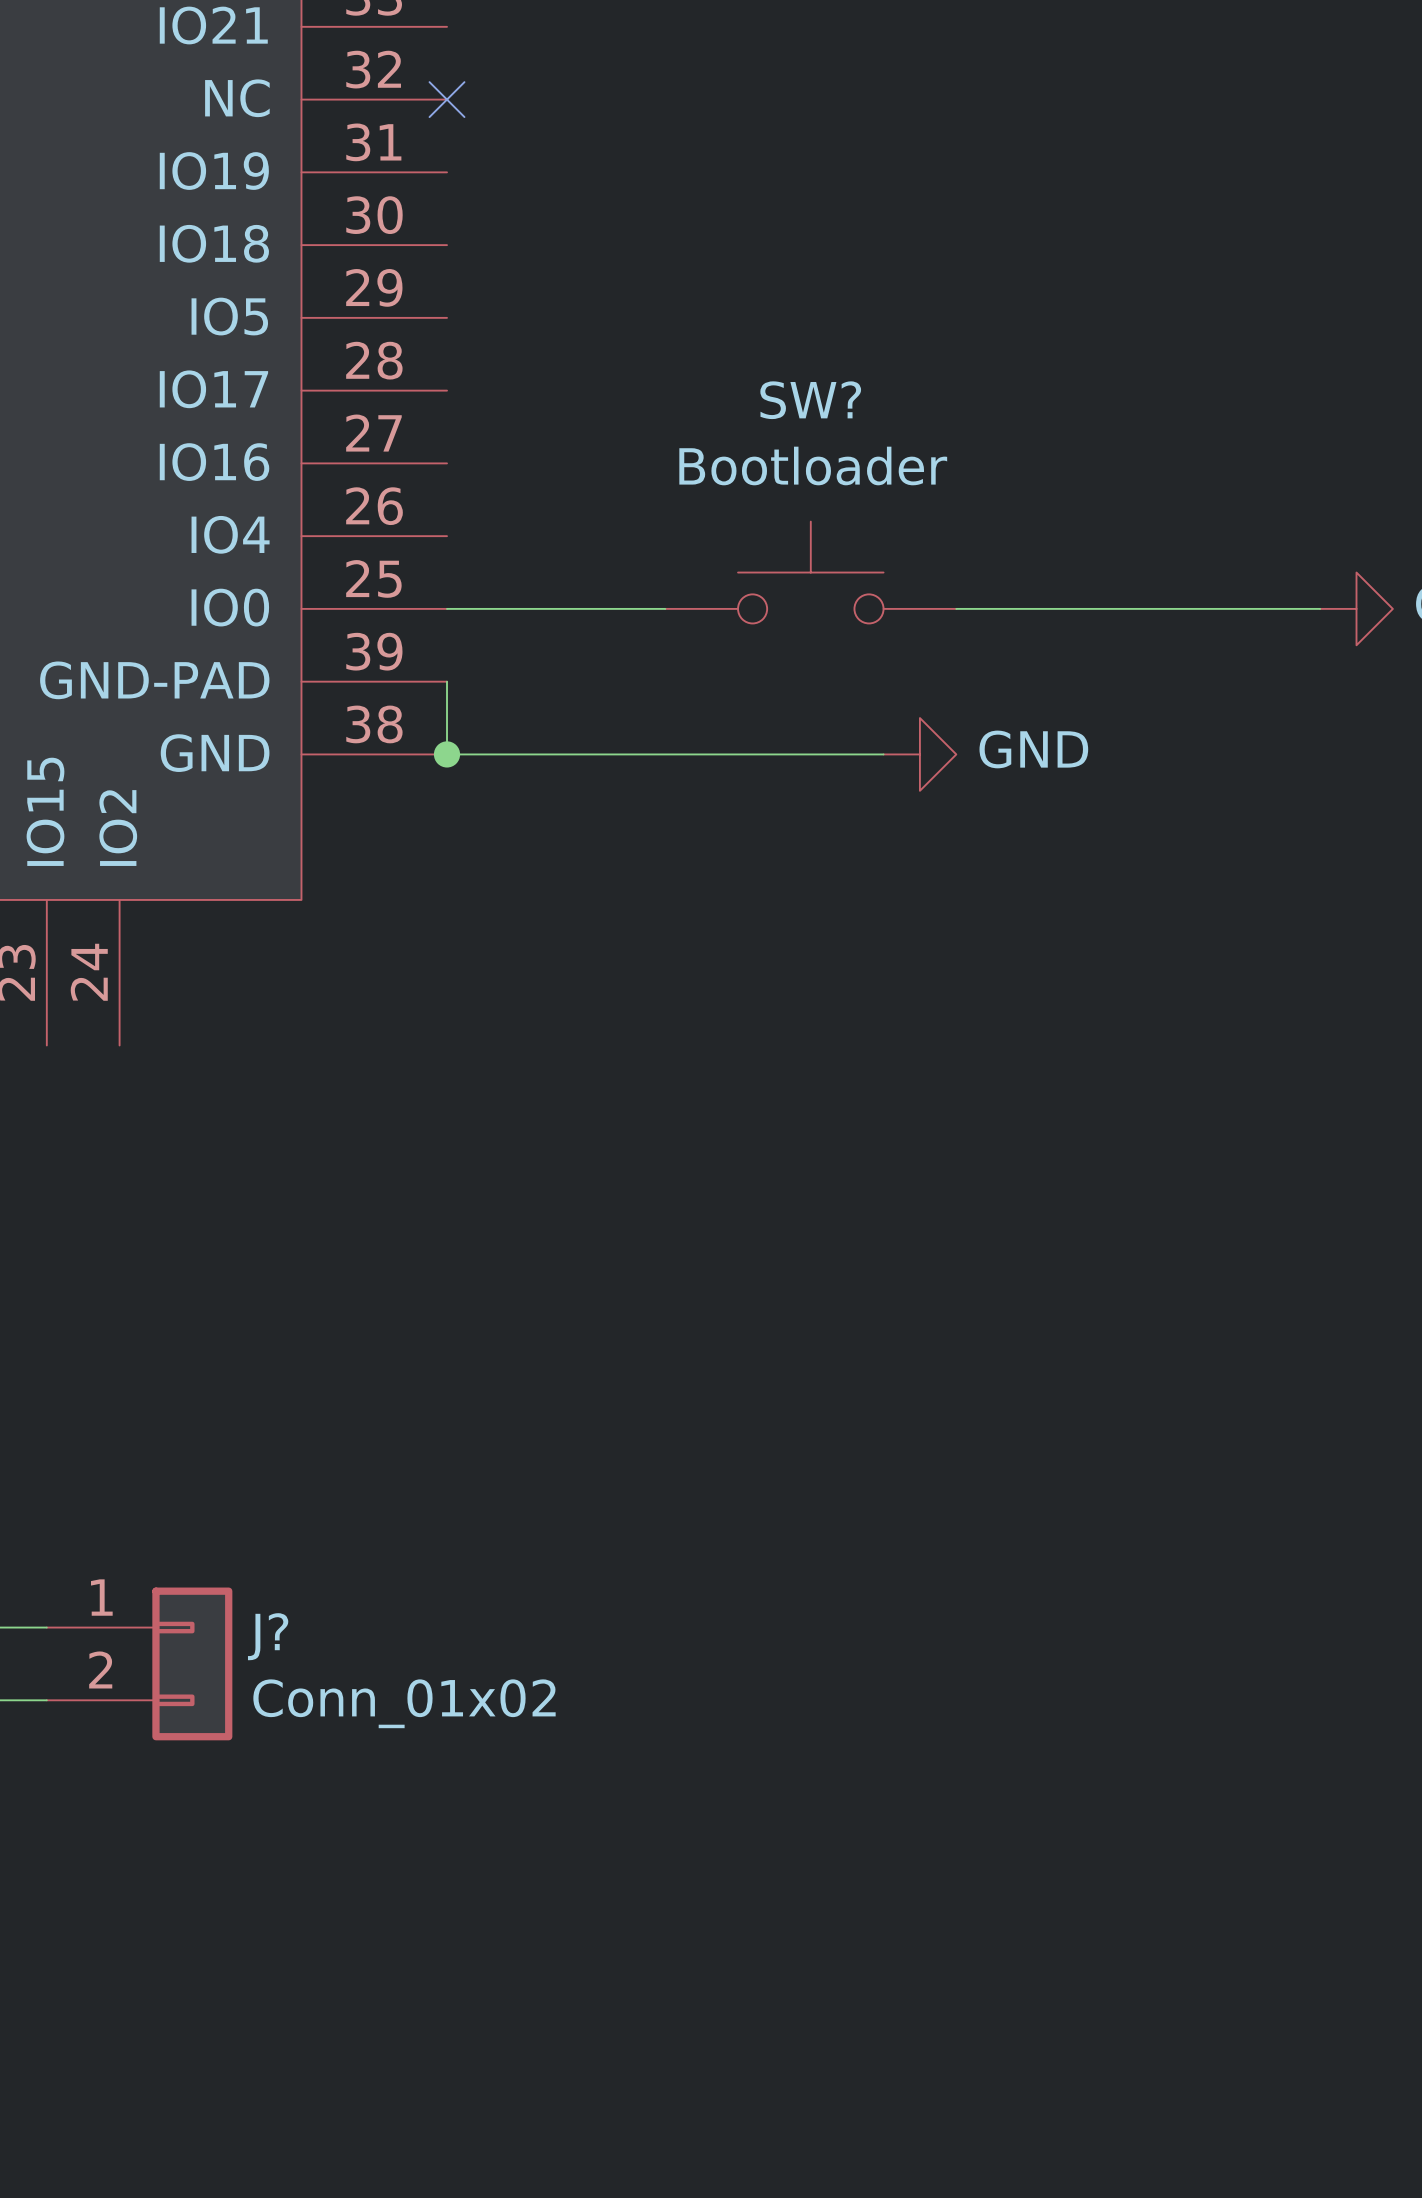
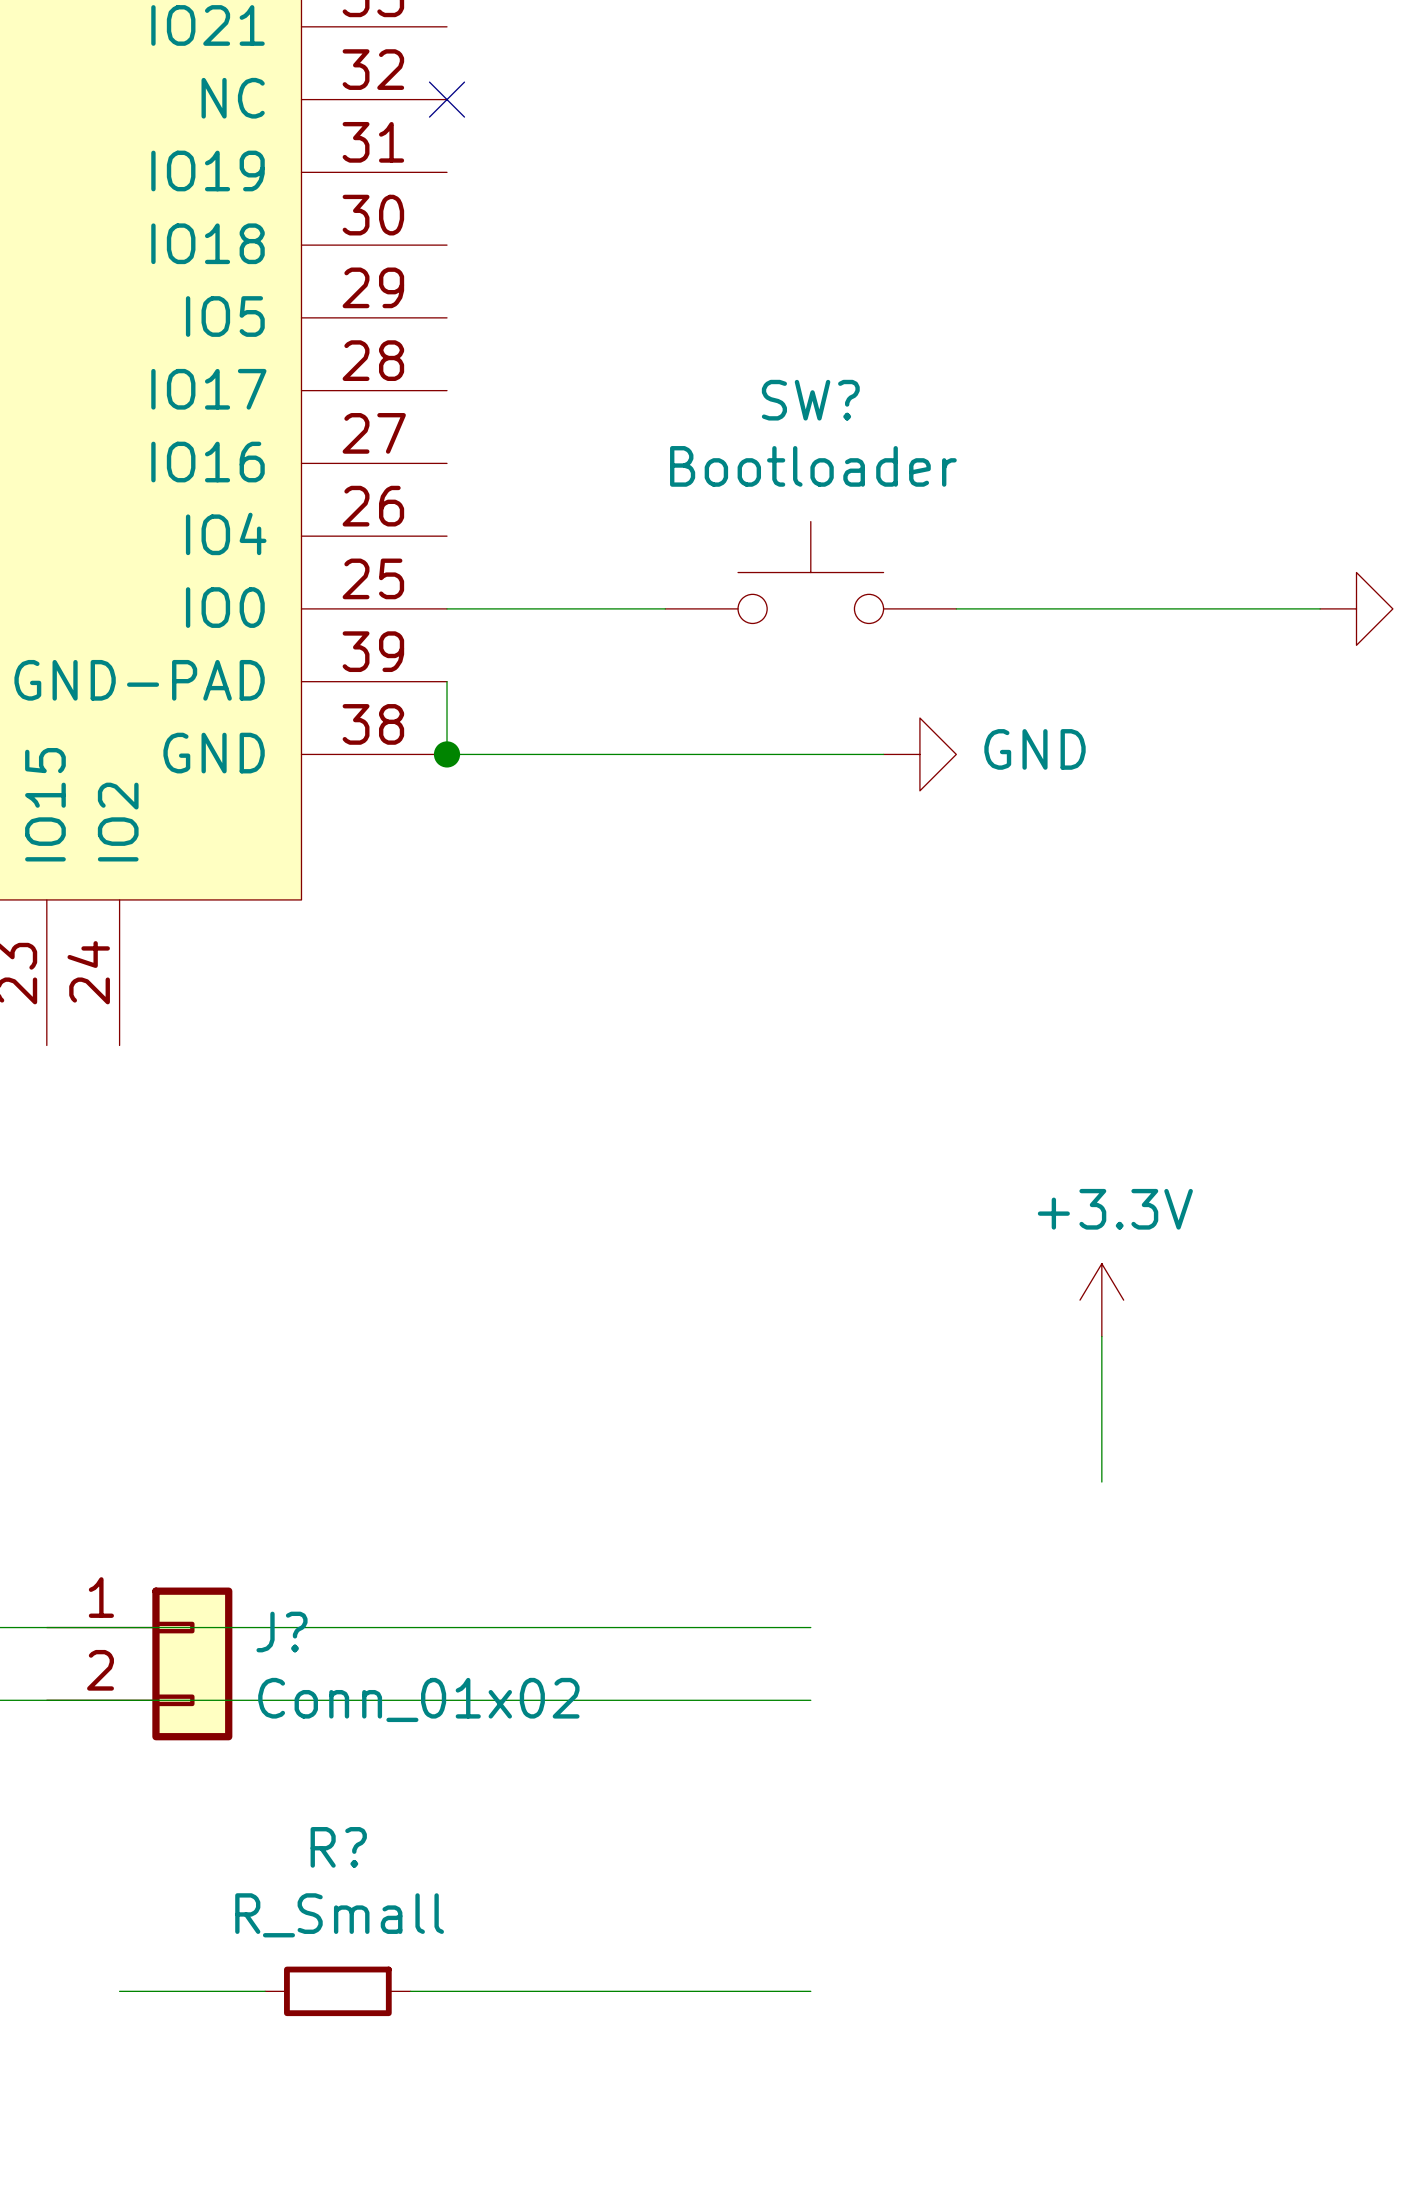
power symbol: none -> +3.3V (1101, 1300)
wire: none -> (1101, 1336) (1101, 1482)
wire: none -> (46, 1627) (810, 1627)
wire: none -> (46, 1700) (810, 1700)
wire: none -> (119, 1991) (265, 1991)
R?: none -> R_Small (337, 1991)
wire: none -> (410, 1991) (810, 1991)

